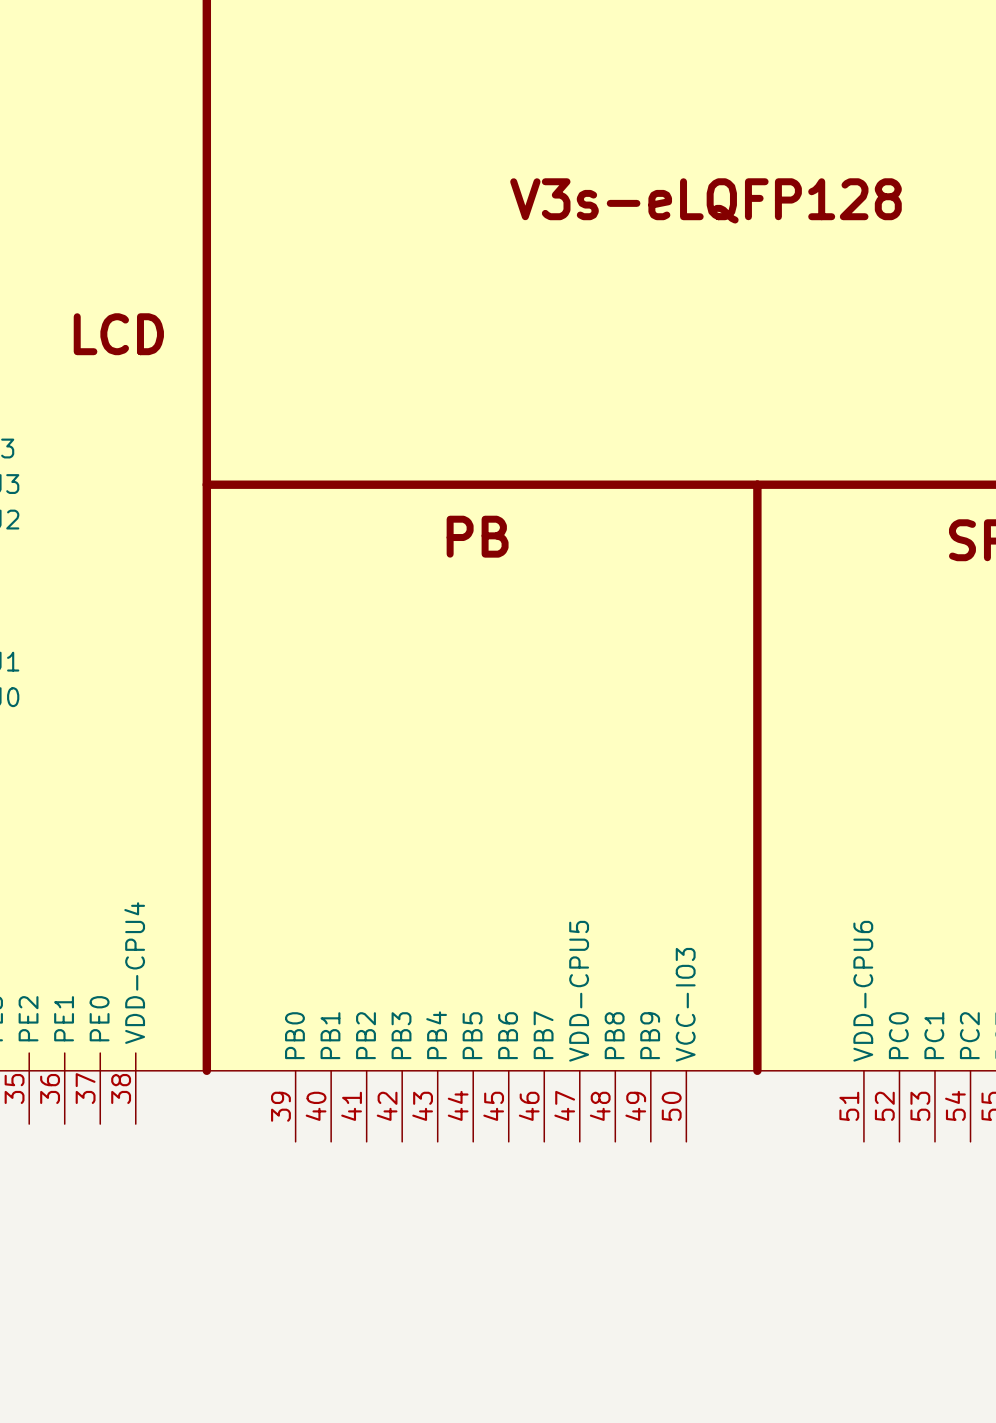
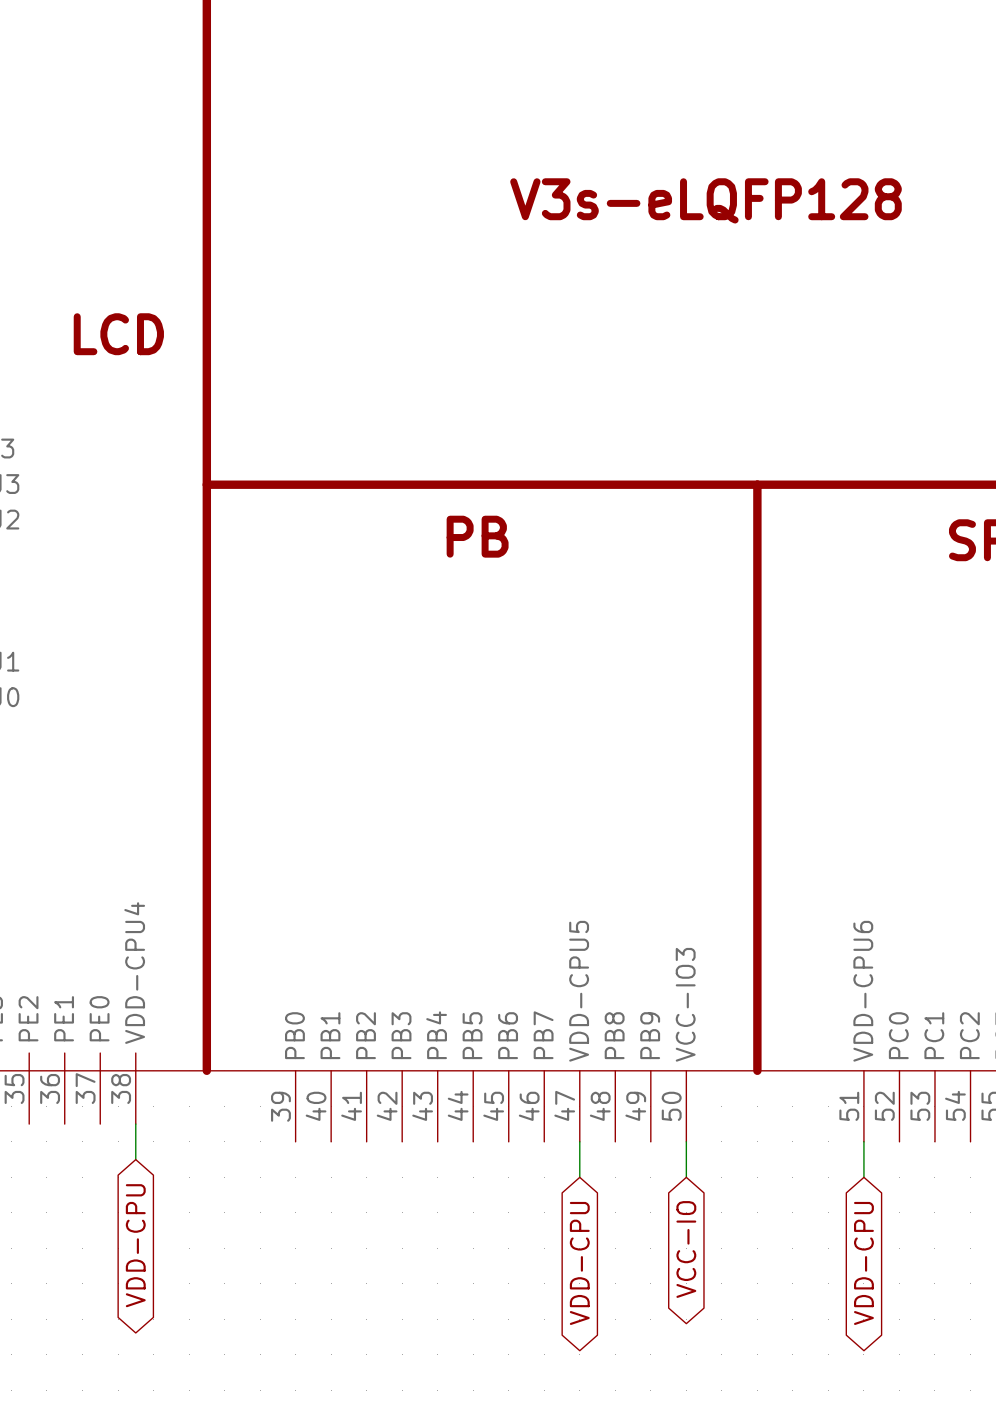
wire: none -> (135, 1124) (135, 1159)
wire: none -> (579, 1141) (579, 1177)
wire: none -> (686, 1141) (686, 1177)
wire: none -> (863, 1141) (863, 1177)
global label: none -> VDD-CPU (135, 1245)
global label: none -> VCC-IO (686, 1249)
global label: none -> VDD-CPU (579, 1263)
global label: none -> VDD-CPU (863, 1263)

